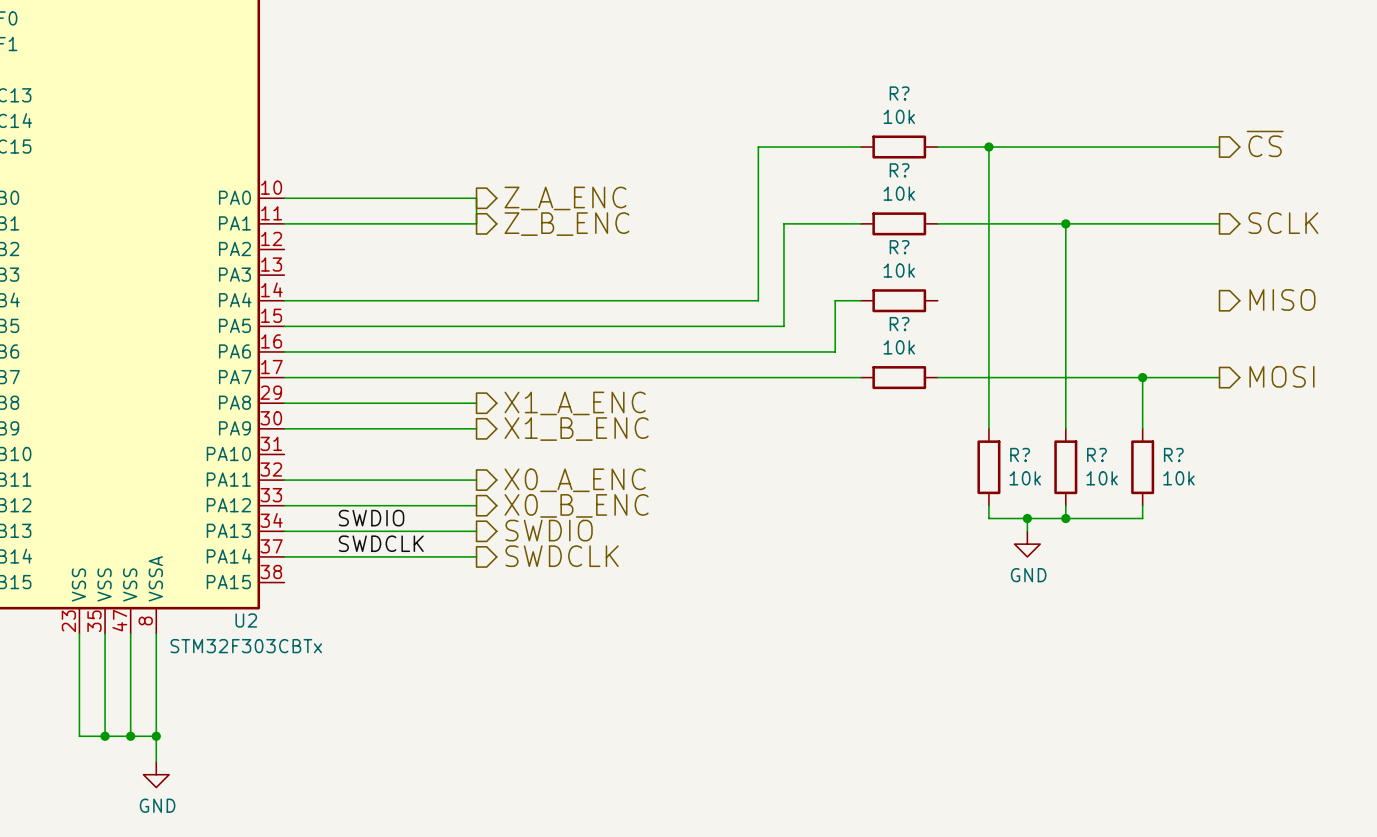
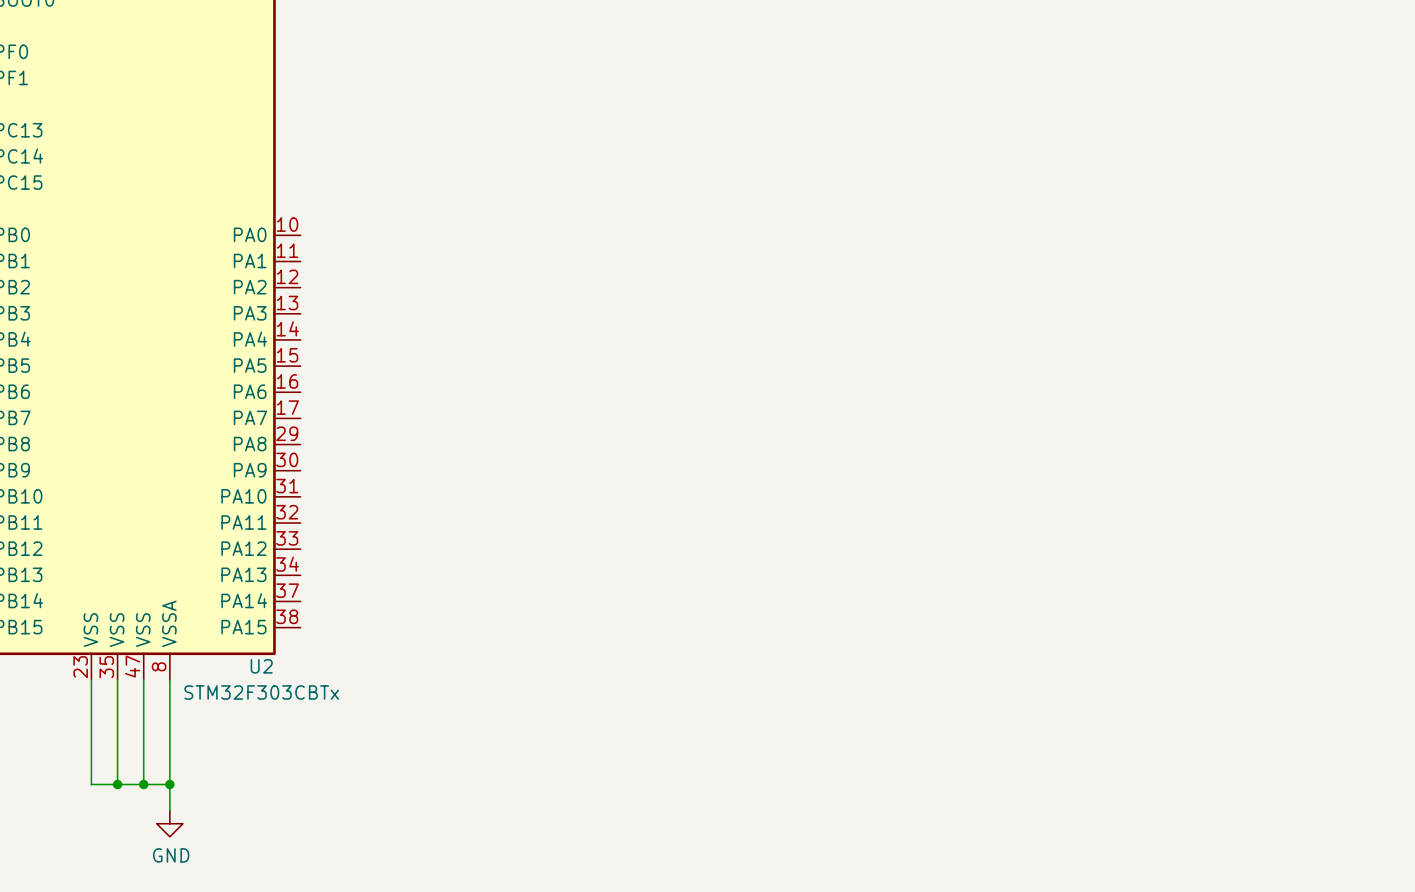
hierarchical label: ~{CS} (1265, 143) -> none
wire: (860, 147) (758, 147) (758, 300) (284, 300) -> none
R?: 10k (899, 147) -> none
wire: (937, 147) (1219, 147) -> none
wire: (988, 147) (988, 428) -> none
junction: (988, 147) -> none
wire: (284, 198) (476, 198) (476, 223) (284, 223) -> none
hierarchical label: Z_A_ENC (565, 198) -> none
wire: (860, 223) (783, 223) (783, 326) (284, 326) -> none
R?: 10k (899, 223) -> none
wire: (937, 223) (1219, 223) -> none
wire: (1065, 223) (1065, 428) -> none
junction: (1065, 223) -> none
hierarchical label: SCLK (1283, 223) -> none
hierarchical label: Z_B_ENC (566, 224) -> none
hierarchical label: MISO (1282, 299) -> none
wire: (860, 300) (835, 300) (835, 351) (284, 351) -> none
R?: 10k (899, 300) -> none
hierarchical label: MOSI (1281, 376) -> none
wire: (284, 377) (860, 377) -> none
R?: 10k (899, 377) -> none
wire: (937, 377) (1219, 377) -> none
wire: (1142, 377) (1142, 428) -> none
junction: (1142, 377) -> none
wire: (284, 403) (476, 403) -> none
hierarchical label: X1_A_ENC (575, 403) -> none
wire: (284, 428) (476, 428) -> none
hierarchical label: X1_B_ENC (576, 429) -> none
R?: 10k (988, 467) -> none
R?: 10k (1065, 467) -> none
R?: 10k (1142, 467) -> none
wire: (284, 480) (476, 480) -> none
hierarchical label: X0_A_ENC (575, 480) -> none
wire: (284, 505) (476, 505) -> none
hierarchical label: X0_B_ENC (576, 505) -> none
wire: (988, 505) (988, 518) (1142, 518) (1142, 505) -> none
wire: (1065, 505) (1065, 518) -> none
label: SWDIO (371, 518) -> none
wire: (1027, 518) (1027, 531) -> none
junction: (1027, 518) -> none
junction: (1065, 518) -> none
hierarchical label: SWDIO (549, 530) -> none
wire: (284, 531) (476, 531) -> none
label: SWDCLK (381, 543) -> none
power symbol: GND (1027, 544) -> none
wire: (284, 556) (476, 556) -> none
hierarchical label: SWDCLK (562, 556) -> none

